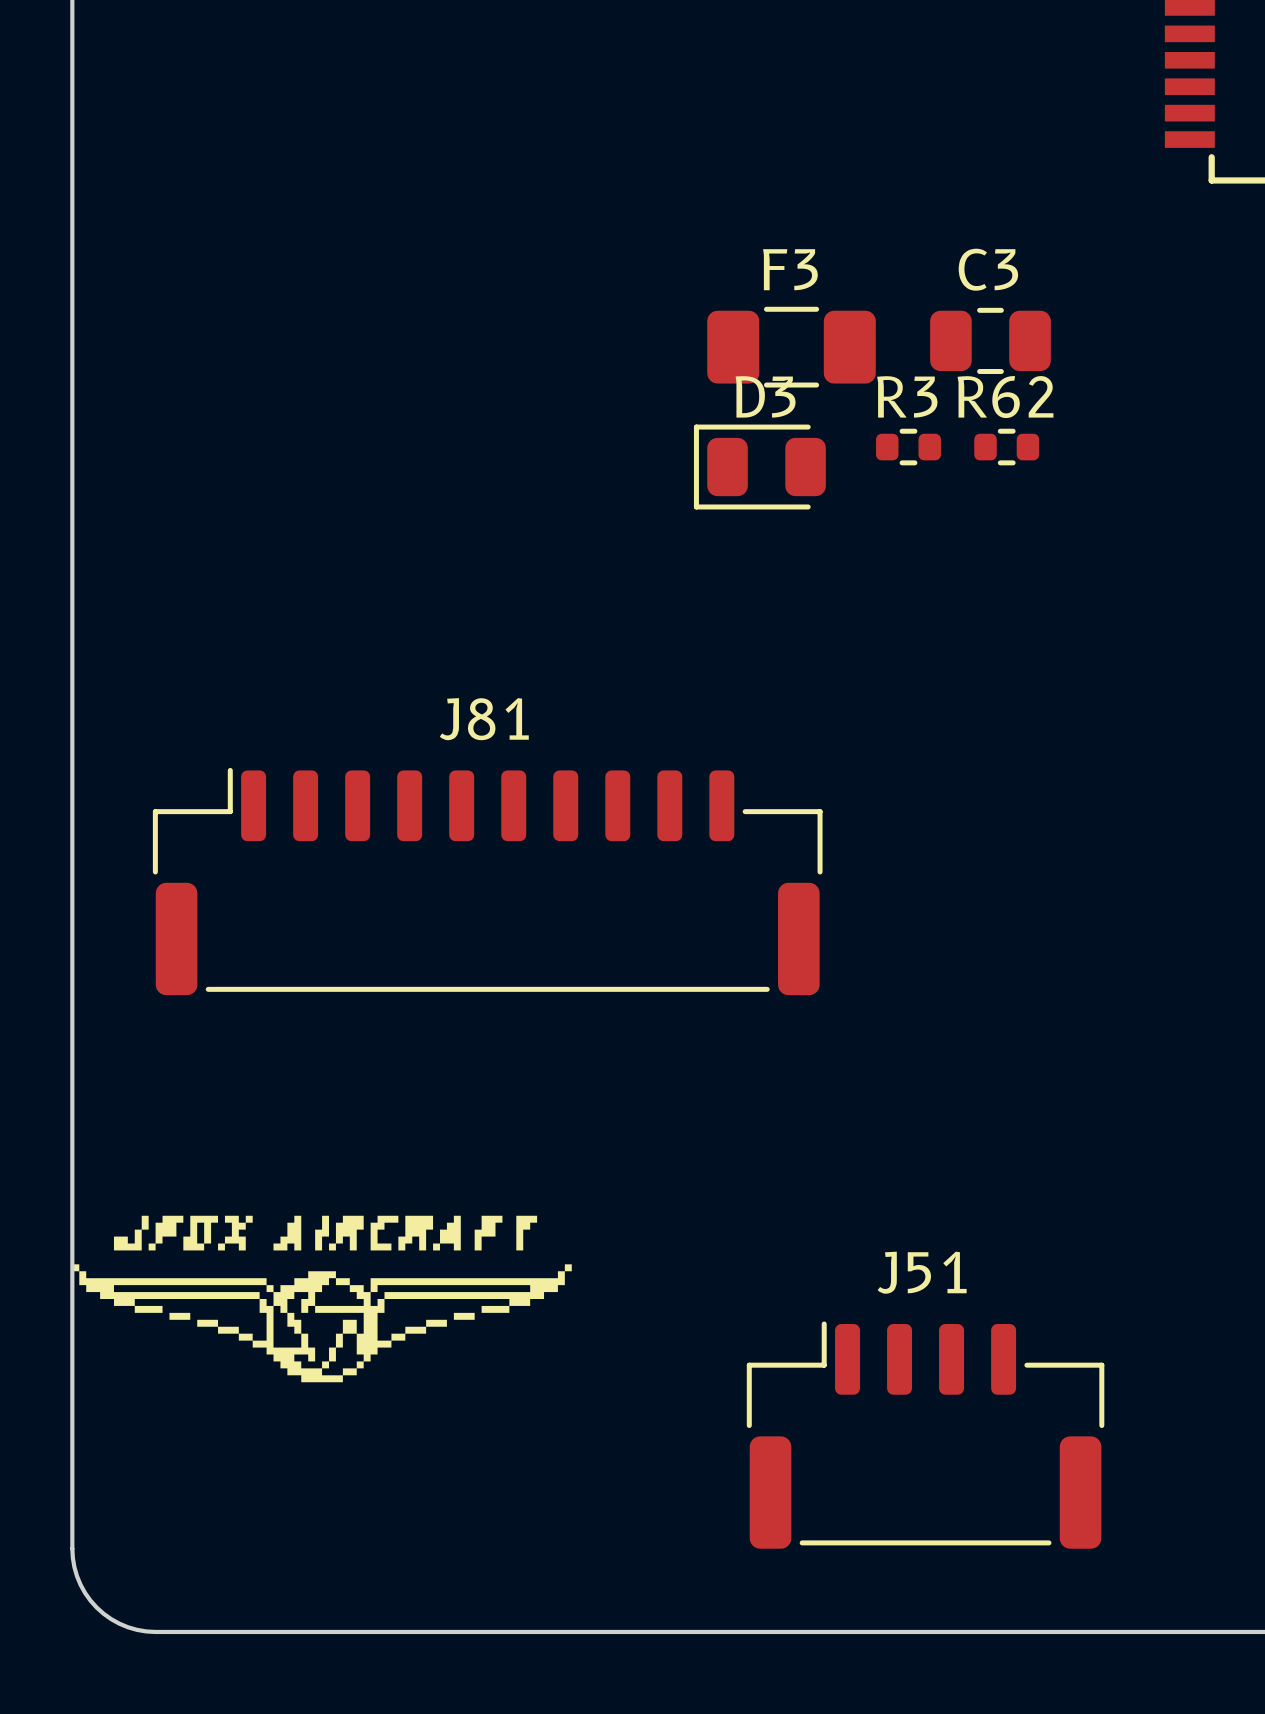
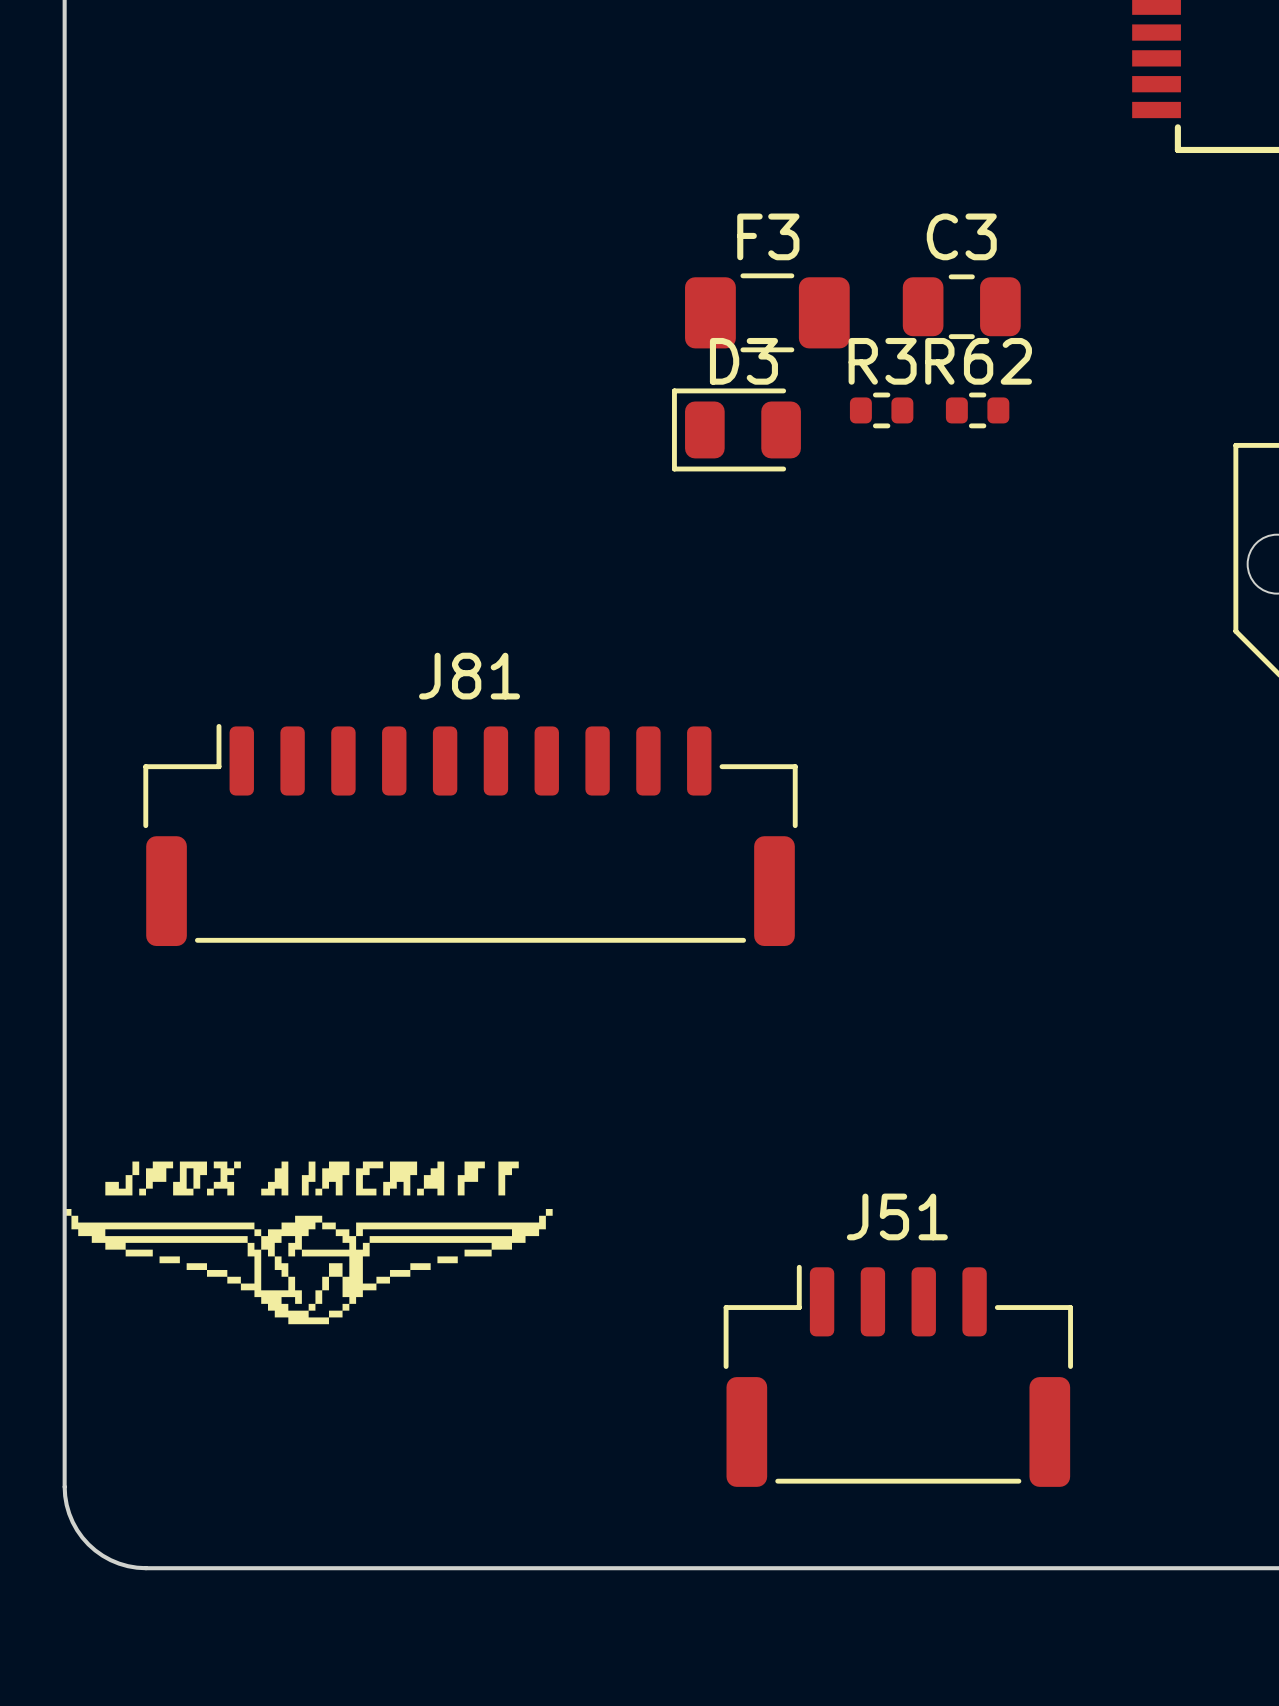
drawing shape: [72, 1215, 572, 1383] -> [64, 1161, 553, 1325]

